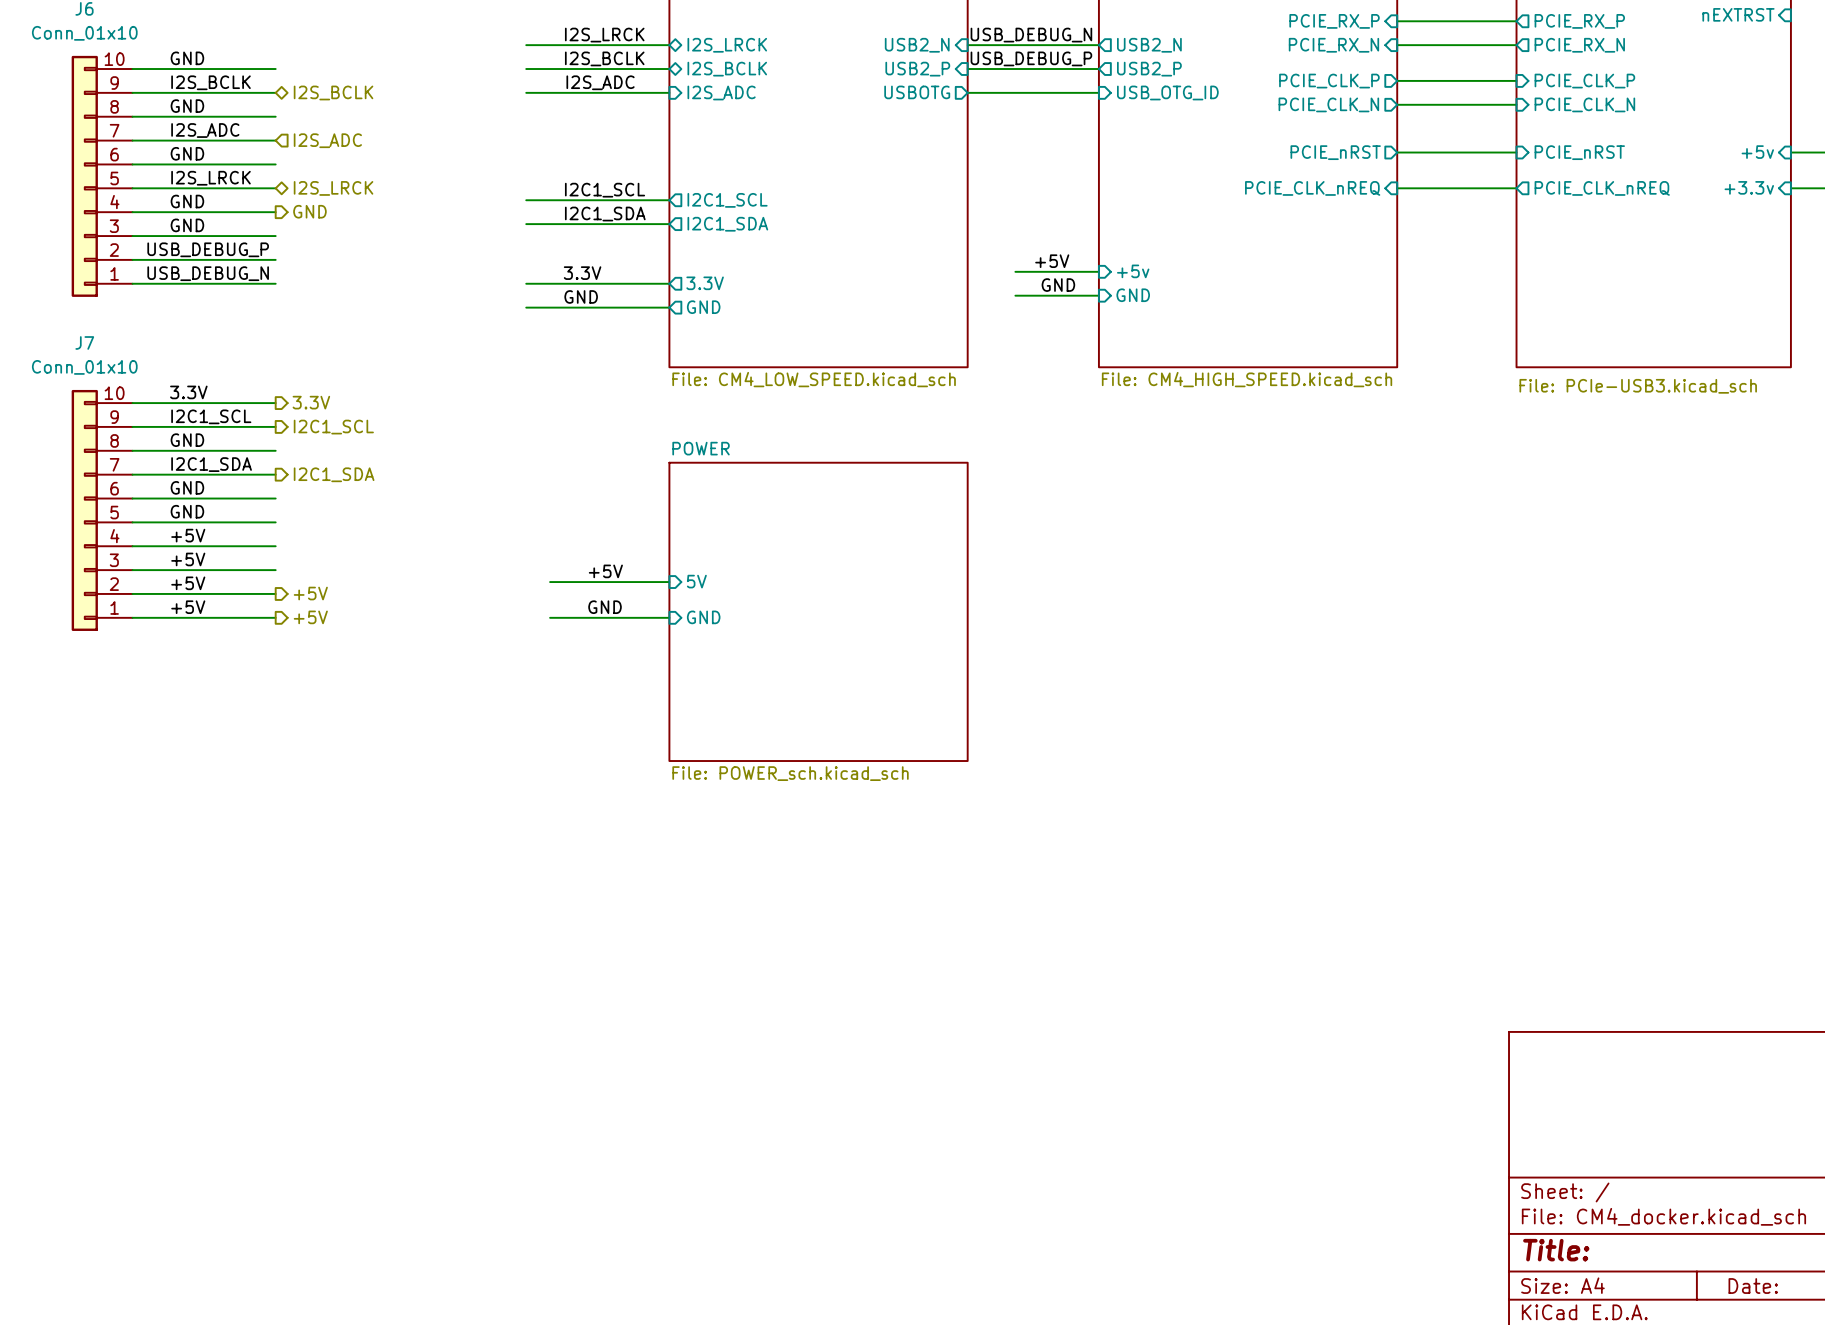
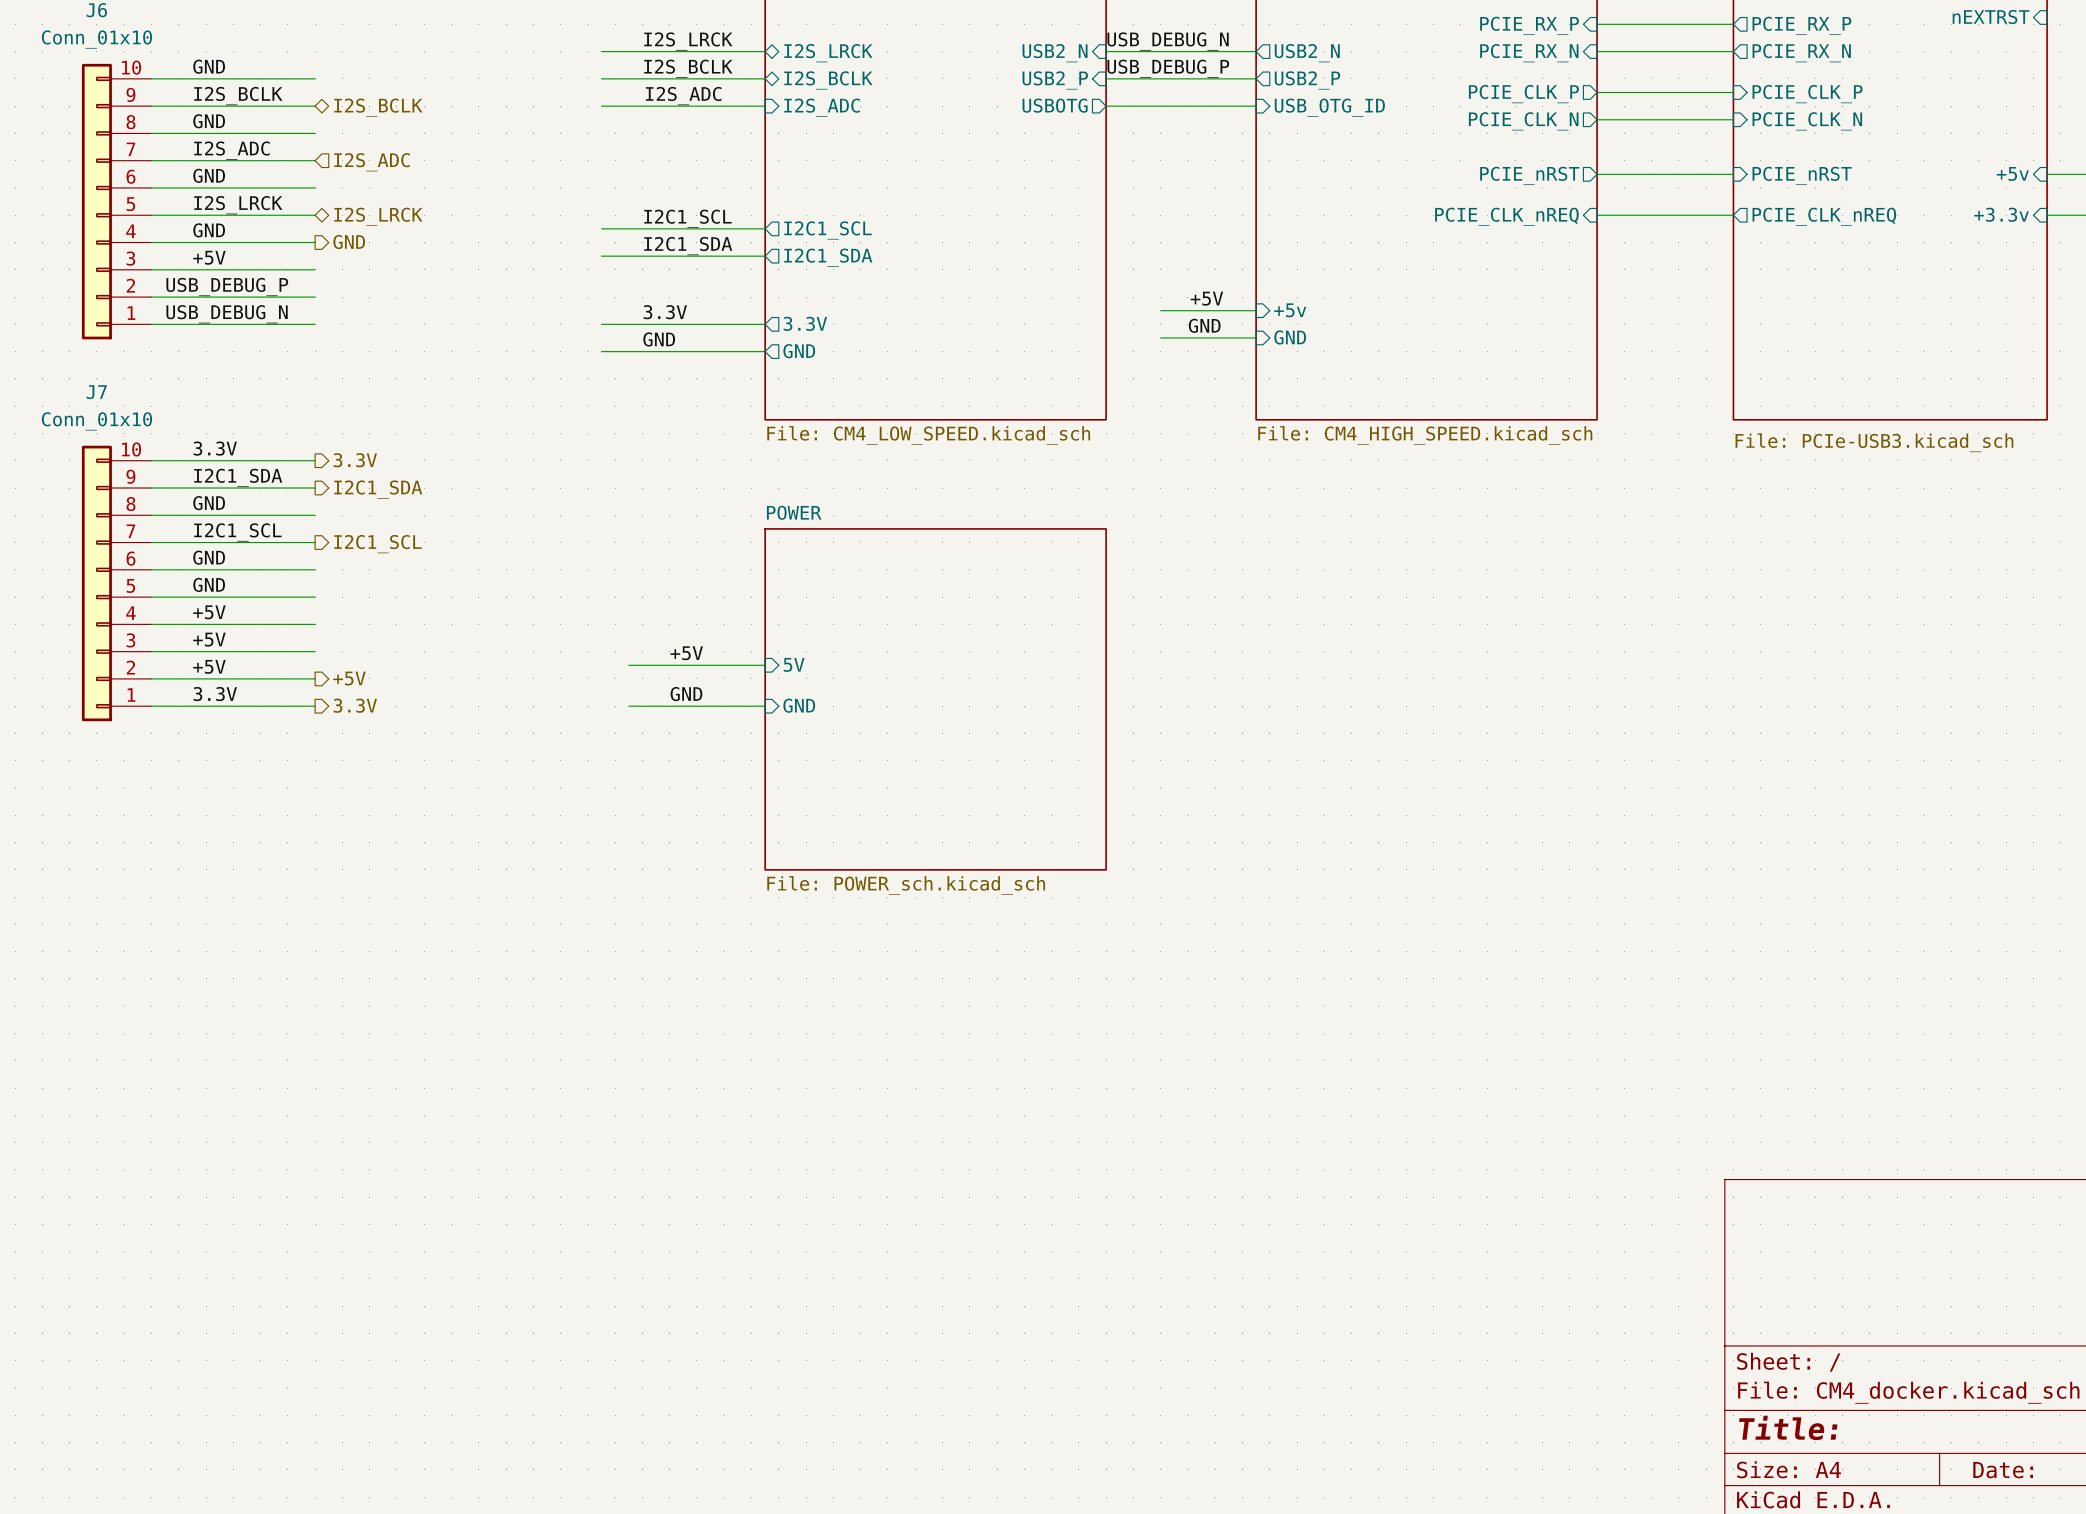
label: GND (187, 225) -> +5V (209, 257)
label: I2C1_SCL (211, 416) -> I2C1_SDA (238, 477)
hierarchical label: I2C1_SCL (333, 427) -> I2C1_SDA (378, 489)
label: I2C1_SDA (211, 464) -> I2C1_SCL (237, 532)
hierarchical label: I2C1_SDA (334, 474) -> I2C1_SCL (377, 544)
label: +5V (188, 607) -> 3.3V (215, 694)
hierarchical label: +5V (310, 617) -> 3.3V (355, 705)

